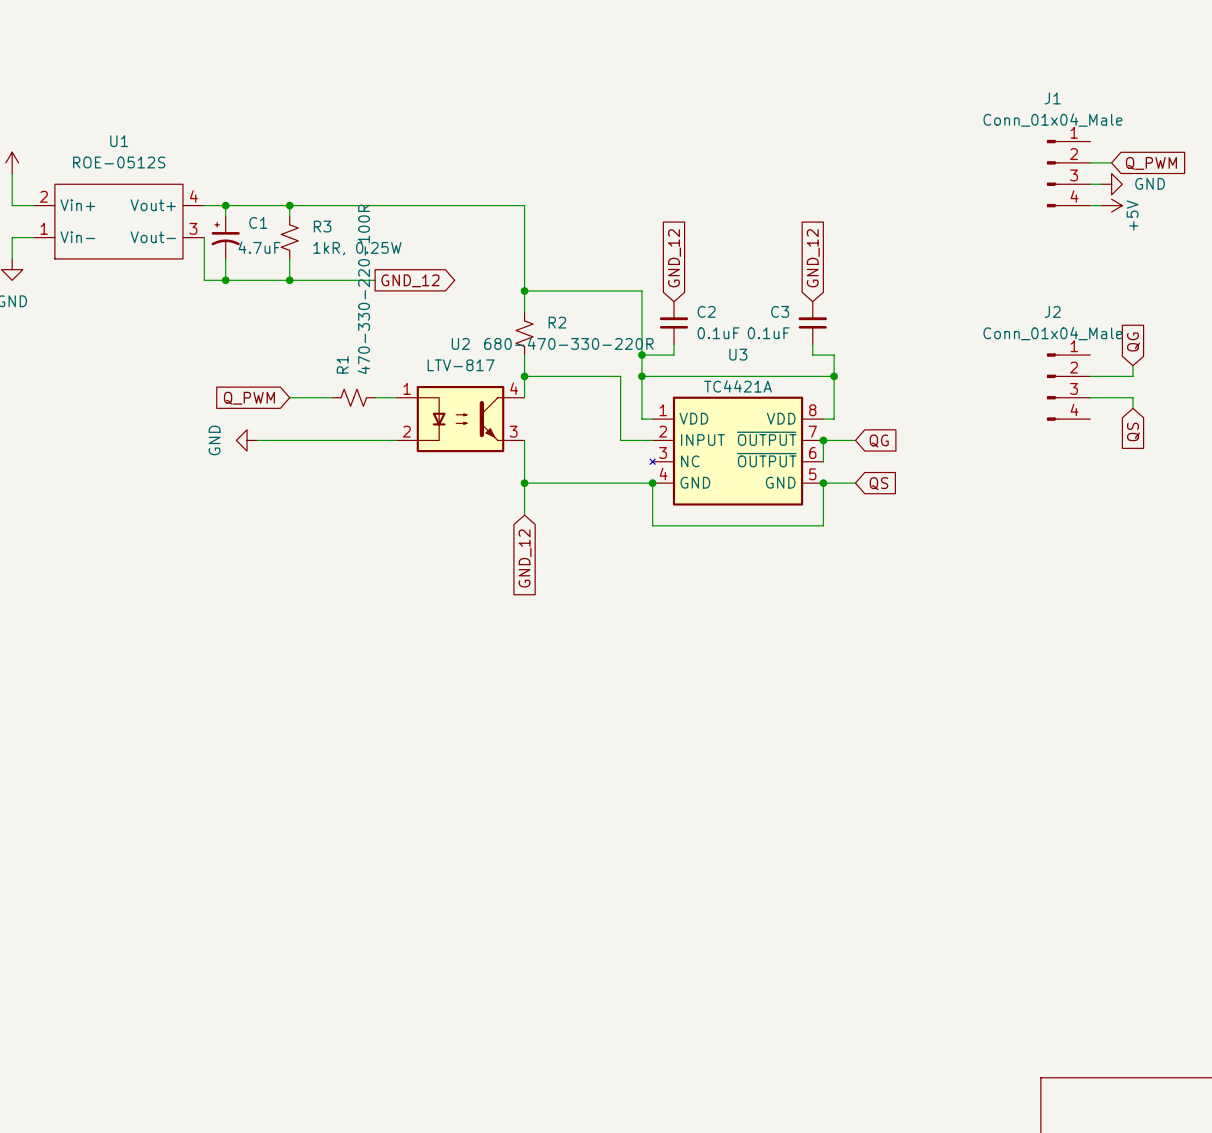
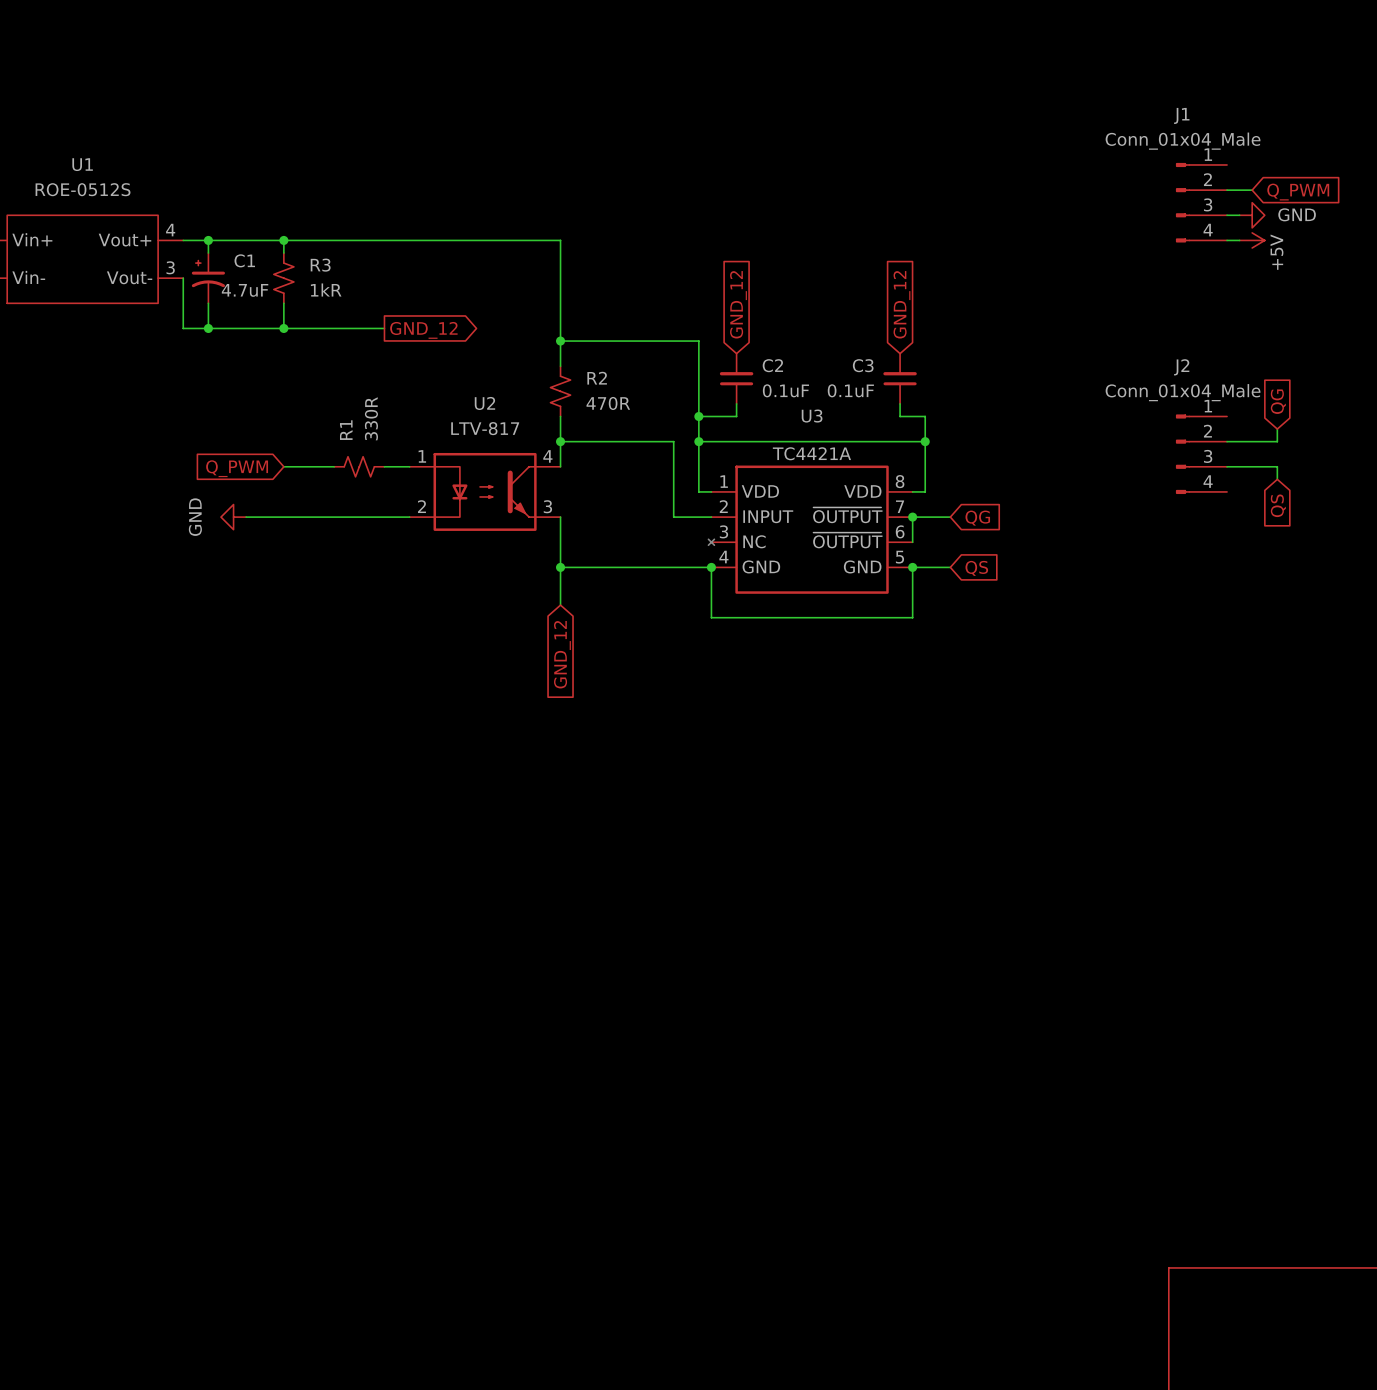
R3 value: 1kR, 0.25W (357, 248) -> 1kR (326, 290)
R1 value: 470-330-220-100R (363, 289) -> 330R (371, 418)
R2 value: 680-470-330-220R (568, 343) -> 470R (608, 403)

